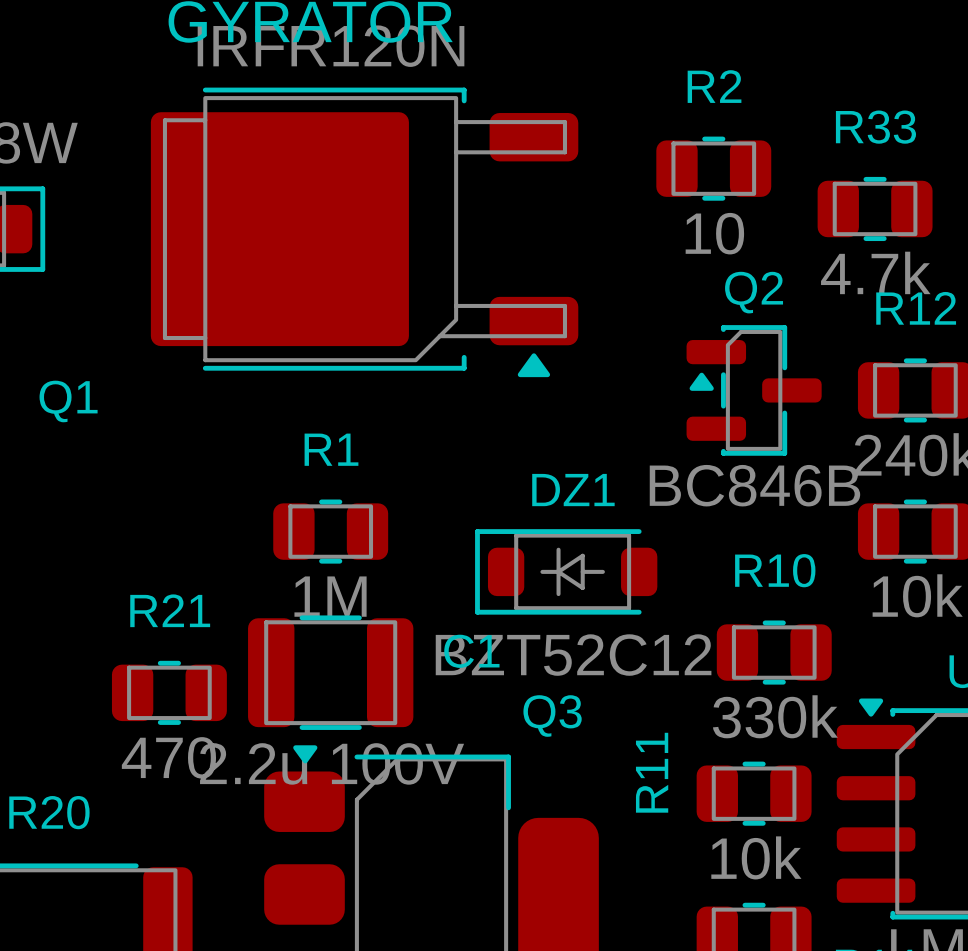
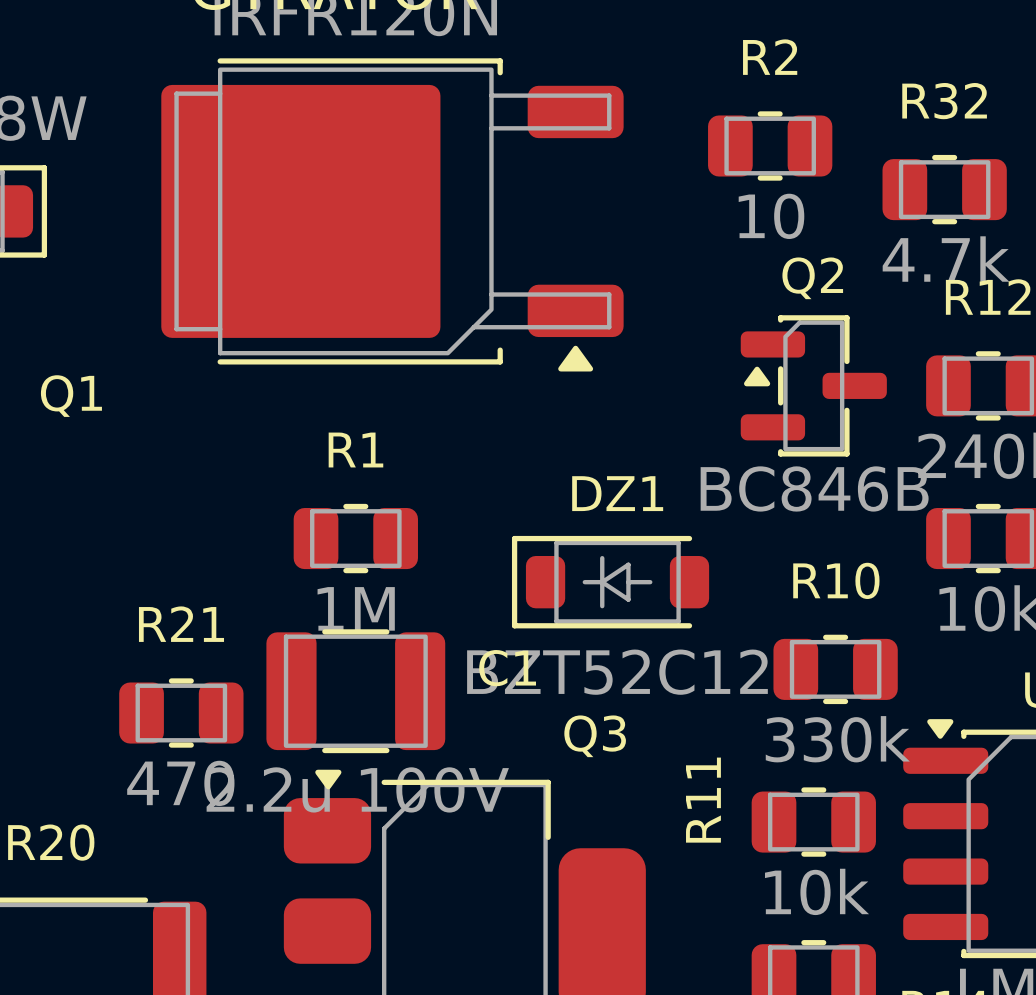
R33 name: R33 (875, 127) -> R32 (944, 101)

